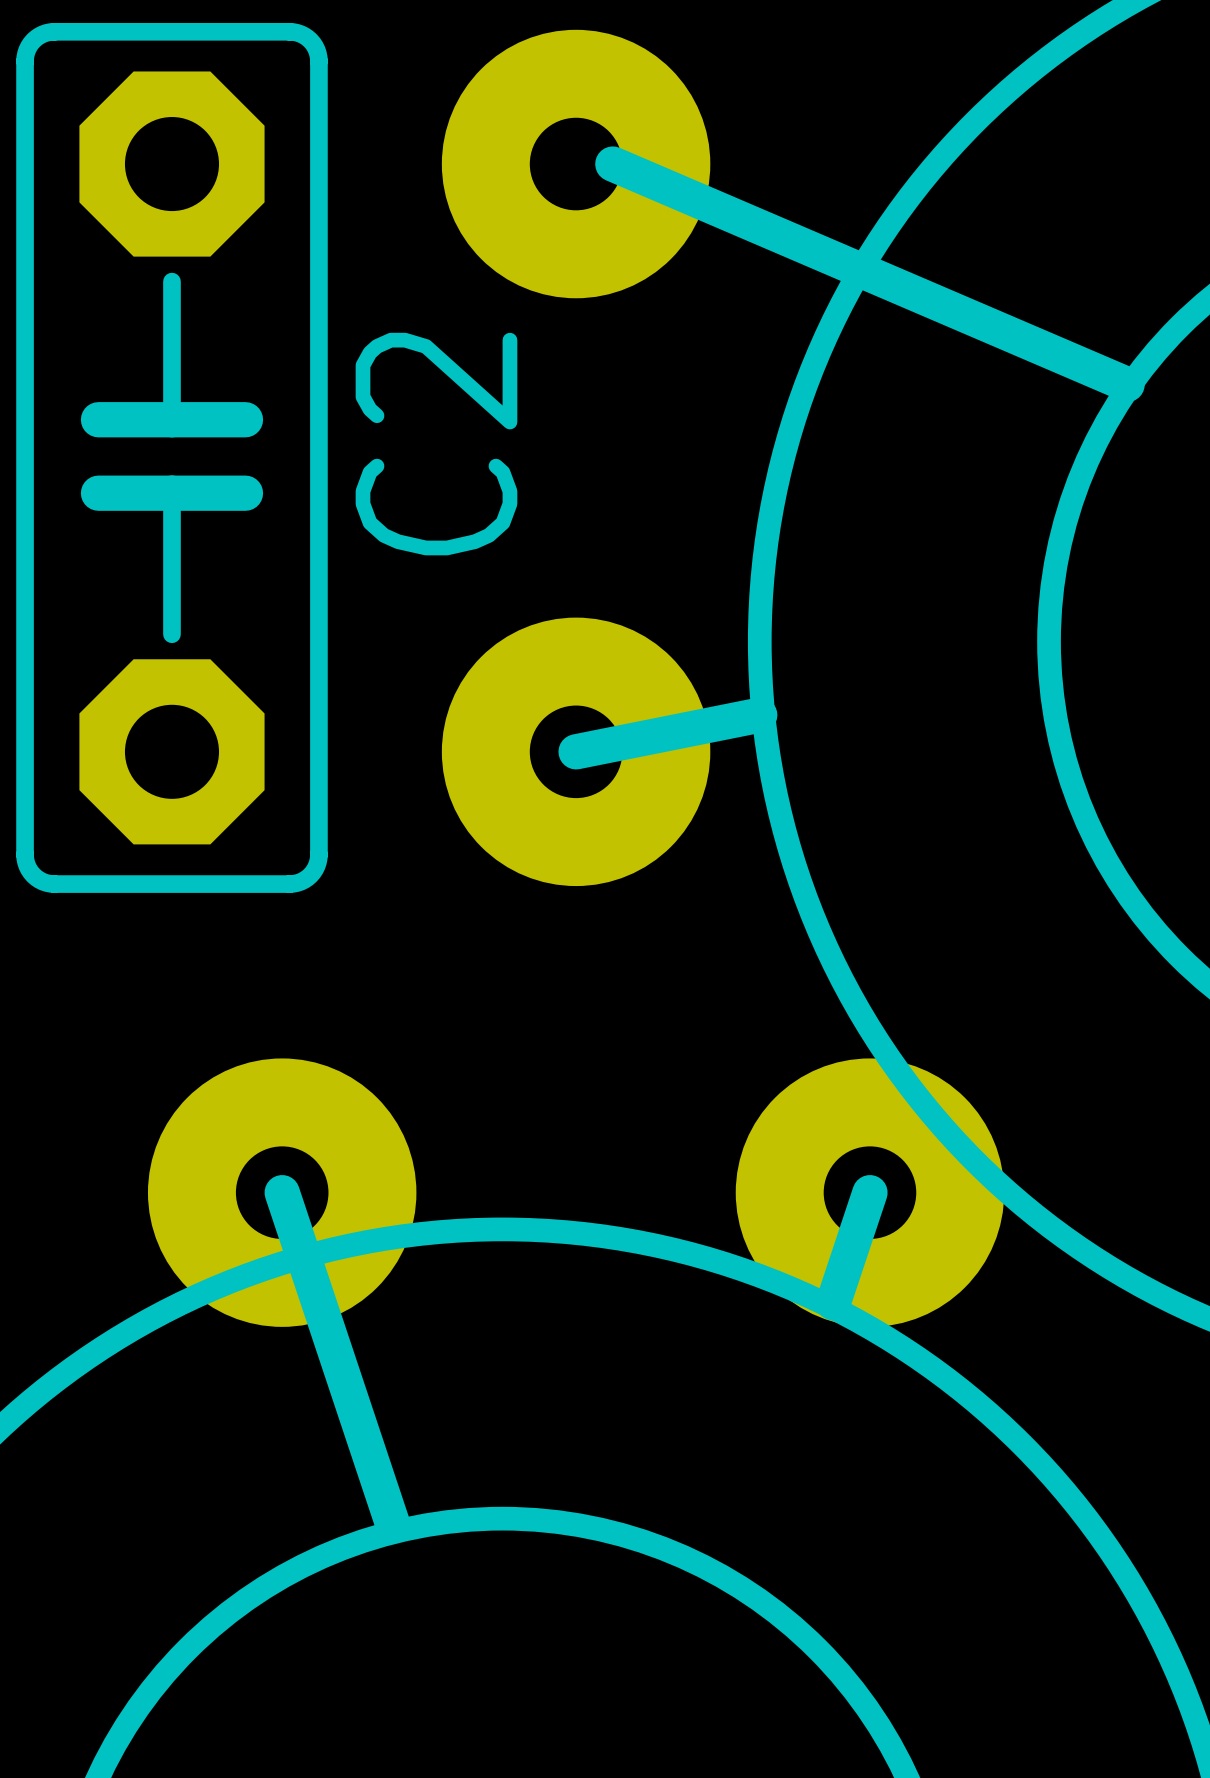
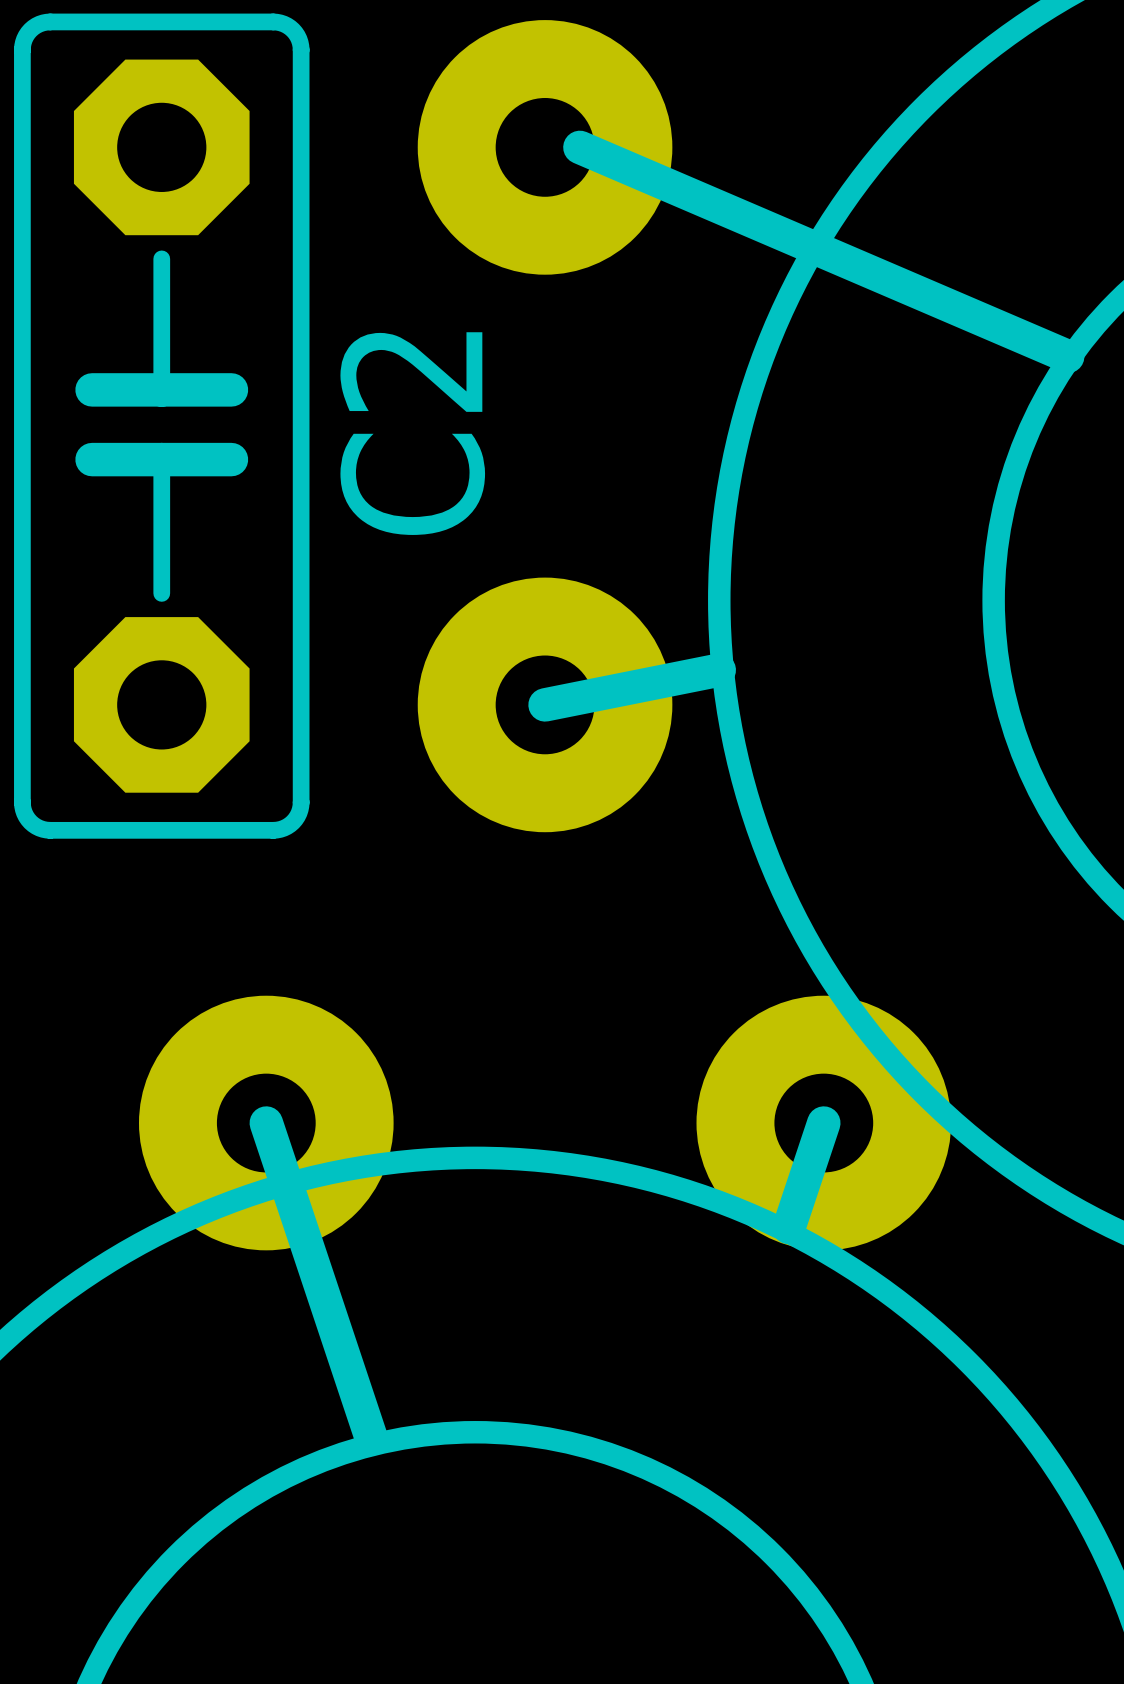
part footprint: [441, 29, 711, 887] -> [417, 20, 673, 833]
part footprint: [147, 1058, 1005, 1327] -> [138, 995, 952, 1251]

